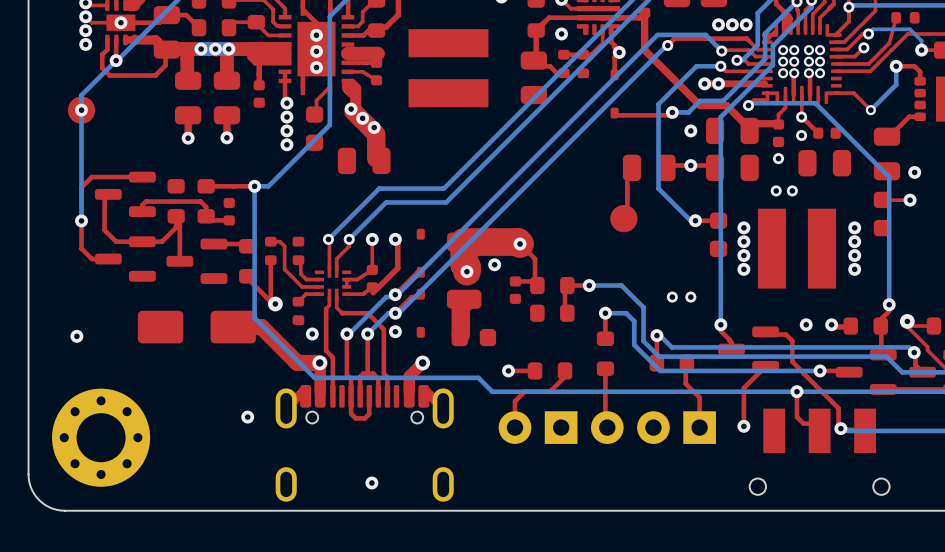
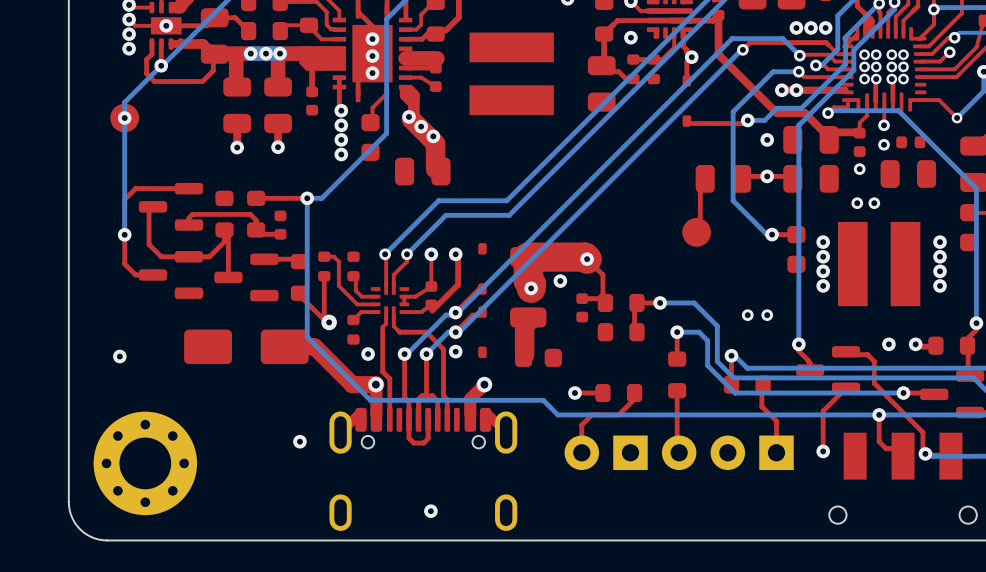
top track: (801, 116) (818, 133) -> none

